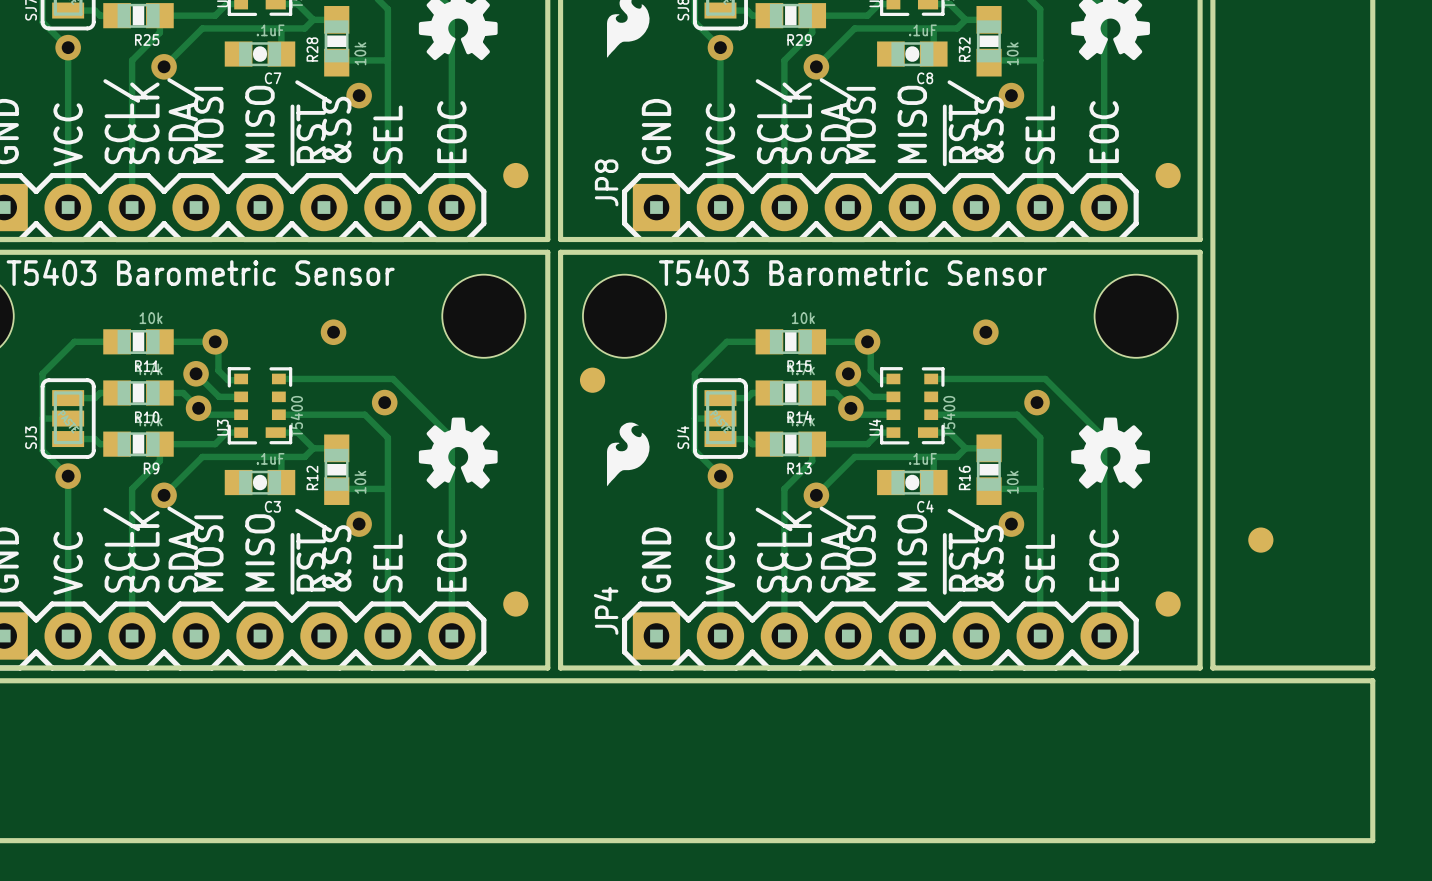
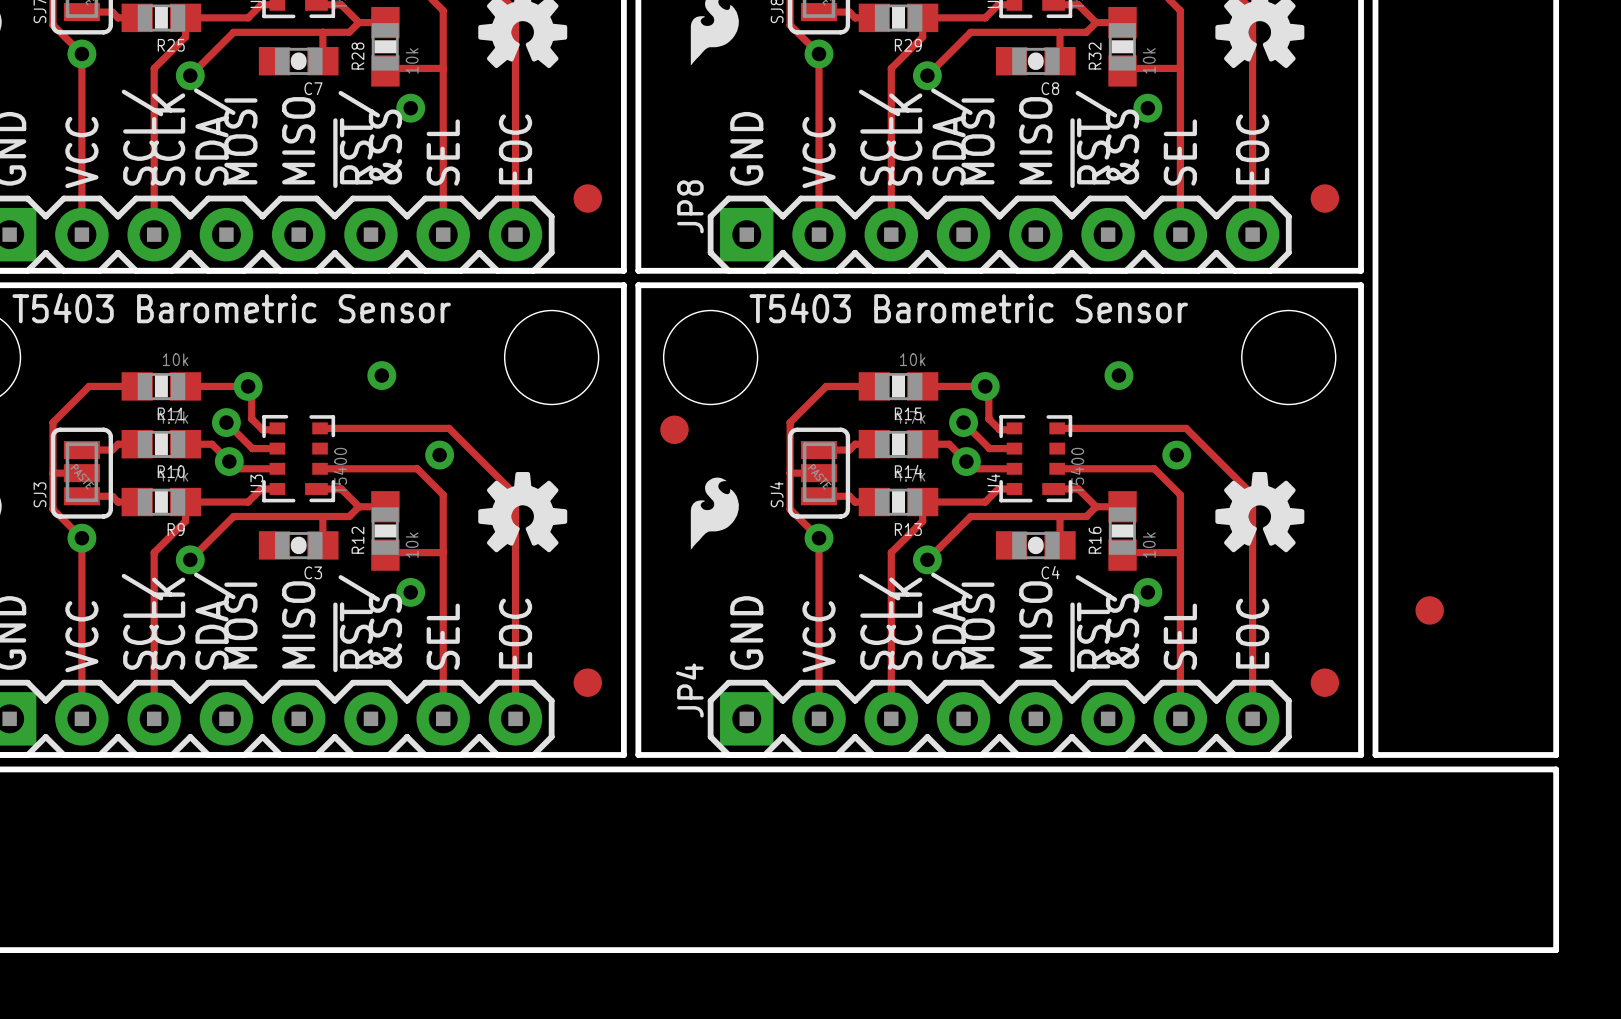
C7 value: .1uF (270, 30) -> none
C8 value: .1uF (922, 30) -> none
C3 value: .1uF (270, 458) -> none
C4 value: .1uF (922, 458) -> none

